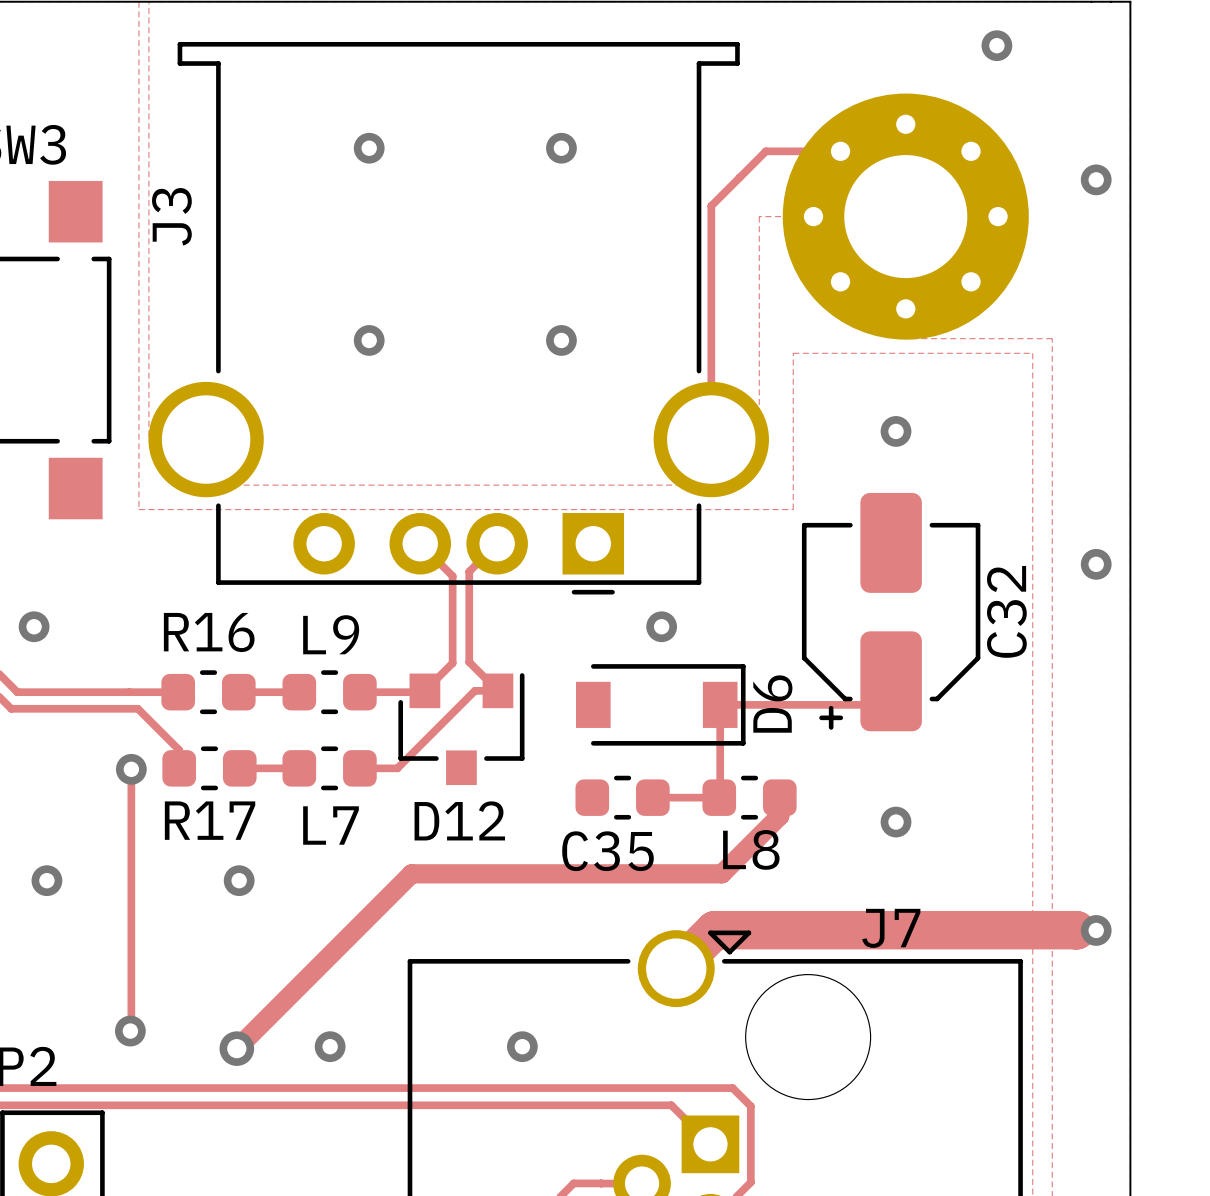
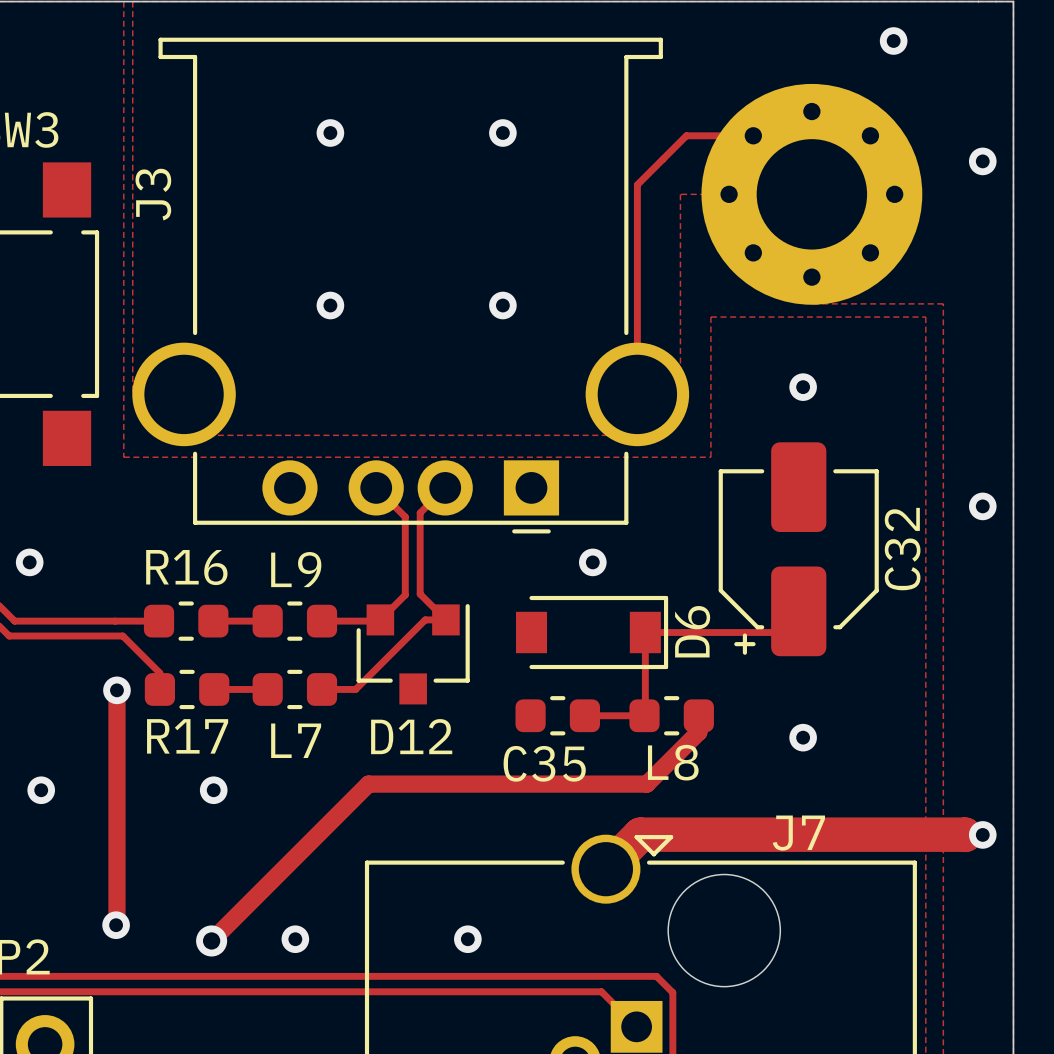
track width: thin (131, 769) (131, 1030) -> thick (116, 690) (116, 924)

